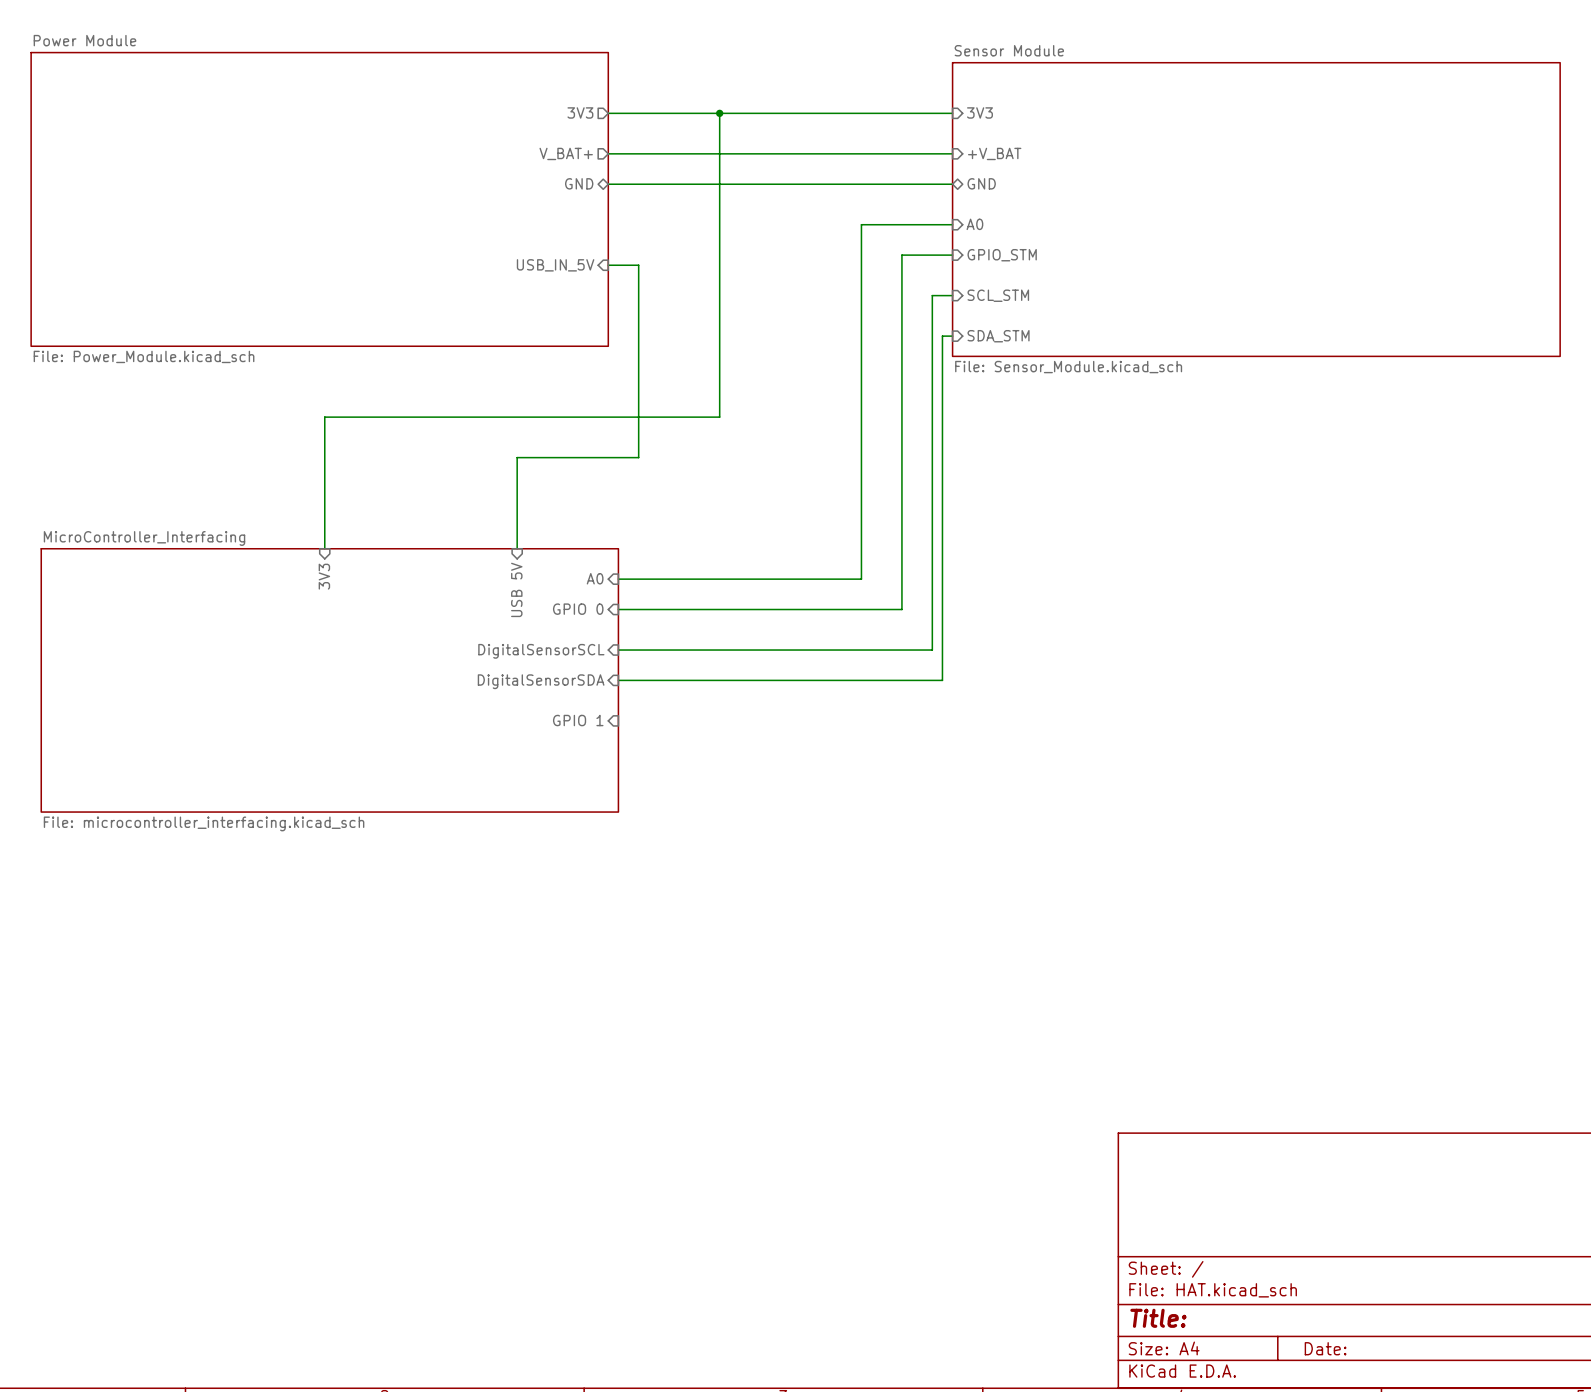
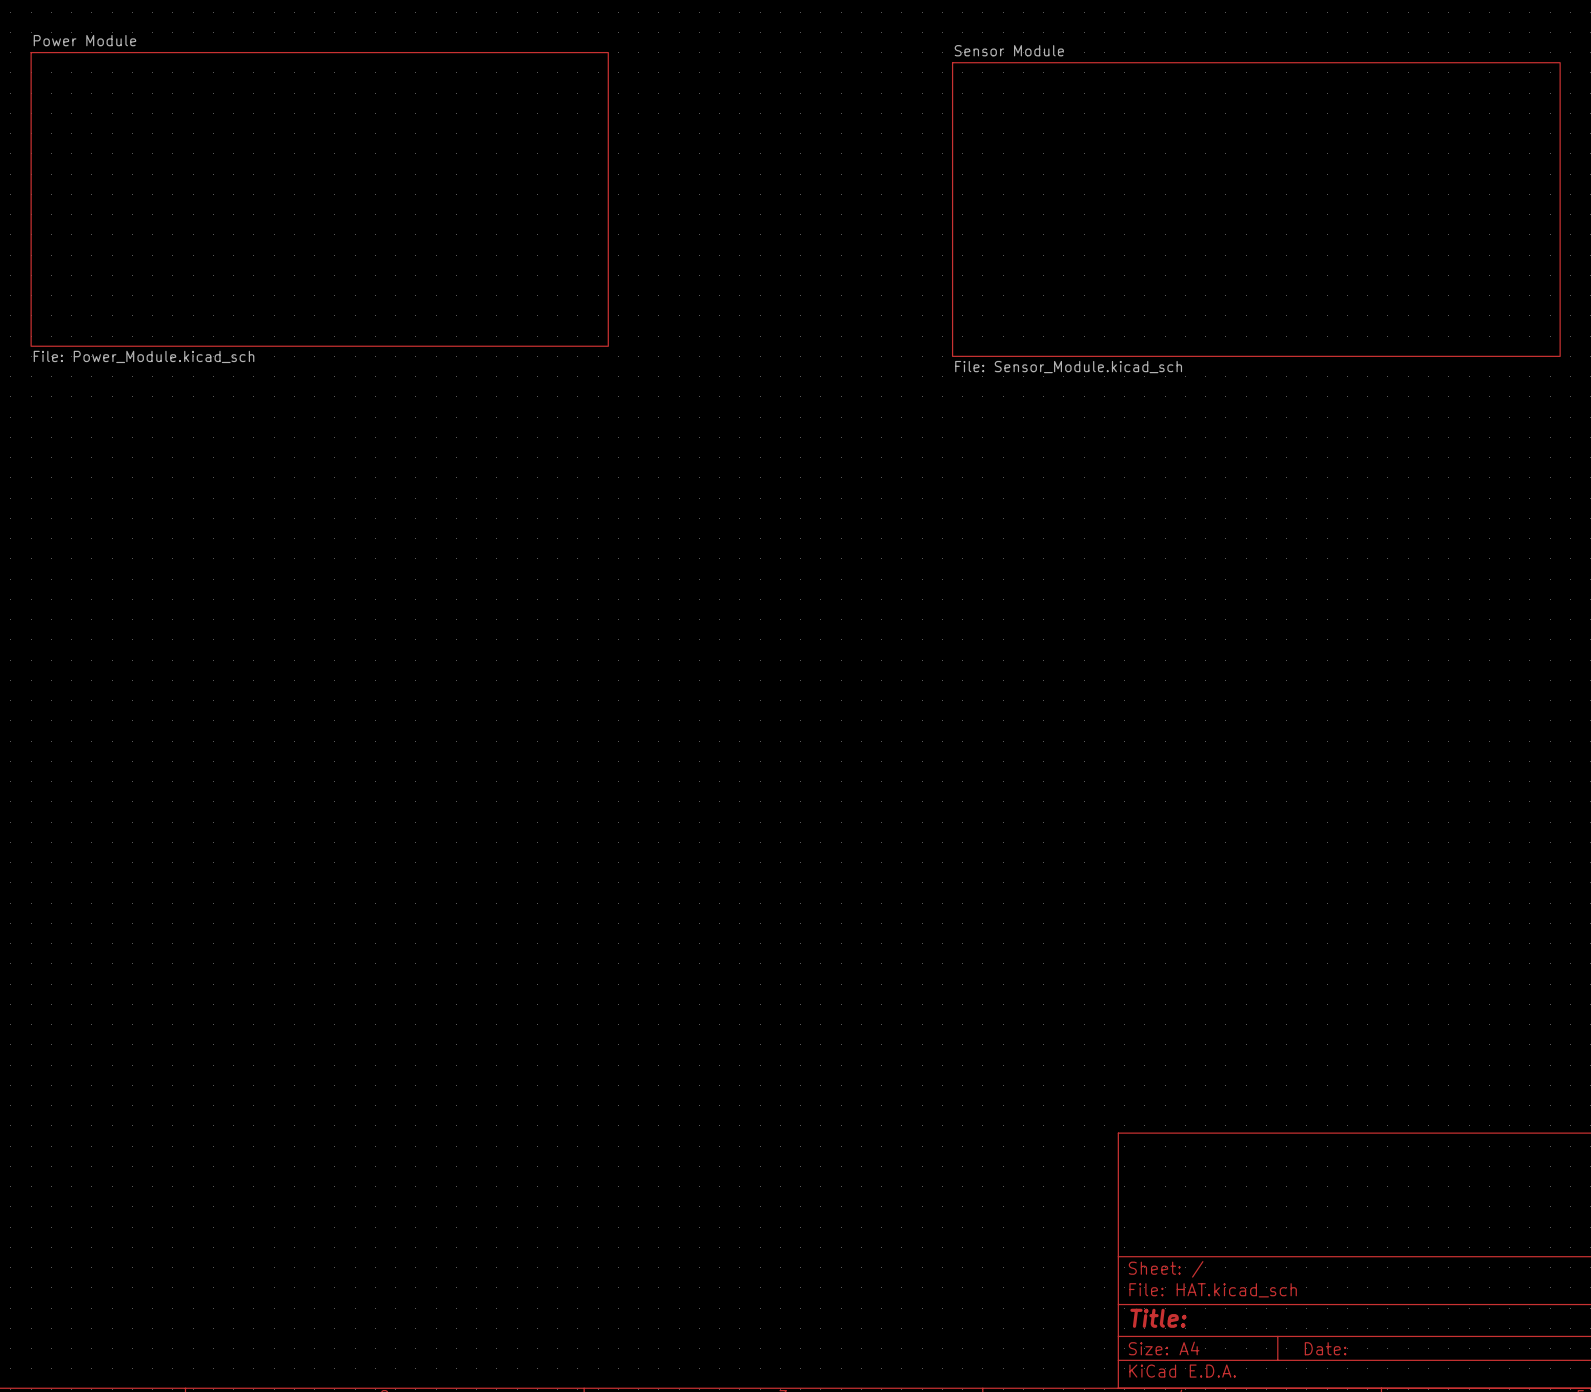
sheet pin: 3V3 (580, 112) -> none
sheet pin: 3V3 (979, 112) -> none
wire: (608, 113) (952, 113) -> none
wire: (719, 113) (719, 417) (324, 417) (324, 548) -> none
junction: (719, 113) -> none
sheet pin: V_BAT+ (566, 153) -> none
wire: (608, 153) (952, 153) -> none
sheet pin: +V_BAT (994, 153) -> none
sheet pin: GND (579, 183) -> none
sheet pin: GND (981, 183) -> none
wire: (608, 184) (952, 184) -> none
wire: (952, 224) (861, 224) (861, 579) (618, 579) -> none
sheet pin: A0 (974, 224) -> none
wire: (952, 255) (901, 255) (901, 609) (618, 609) -> none
sheet pin: GPIO_STM (1002, 255) -> none
sheet pin: USB_IN_5V (555, 265) -> none
wire: (608, 265) (638, 265) (638, 457) (517, 457) (517, 548) -> none
wire: (952, 295) (932, 295) (932, 650) (618, 650) -> none
sheet pin: SCL_STM (998, 295) -> none
wire: (952, 336) (942, 336) (942, 680) (618, 680) -> none
sheet pin: SDA_STM (998, 336) -> none
sheet pin: 3V3 (324, 576) -> none
sheet pin: A0 (595, 578) -> none
sheet pin: USB 5V (516, 589) -> none
sheet pin: GPIO 0 (578, 609) -> none
sheet pin: DigitalSensorSCL (541, 651) -> none
sheet MicroController_Interfacing: File: microcontroller_interfacing.kicad_sch (329, 680) -> none
sheet pin: DigitalSensorSDA (541, 681) -> none
sheet pin: GPIO 1 (578, 720) -> none

